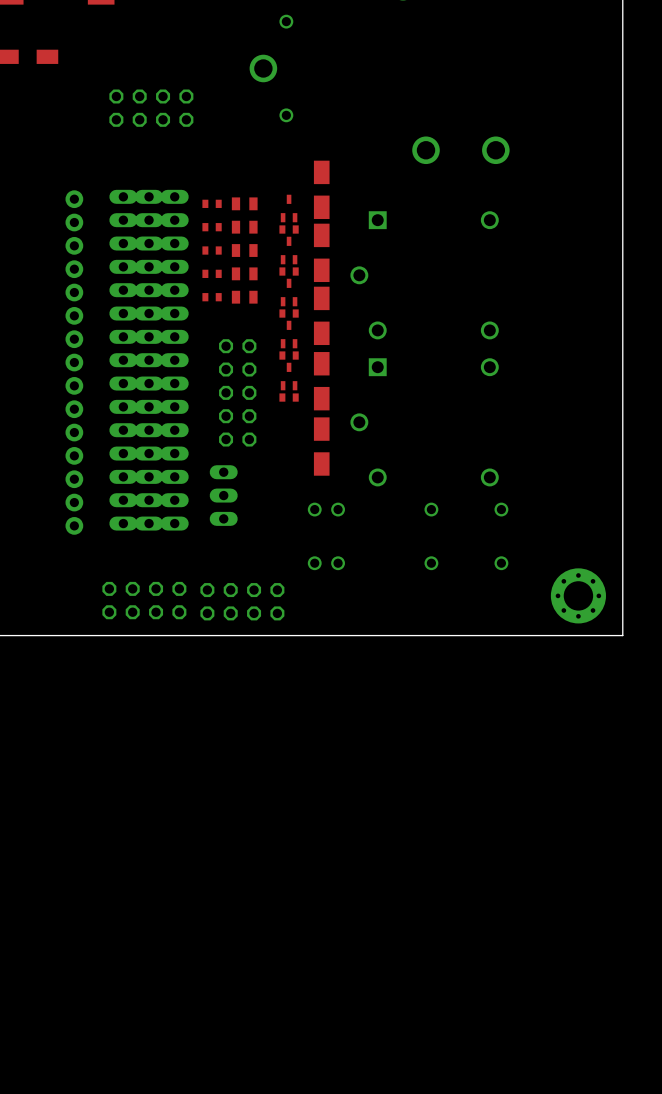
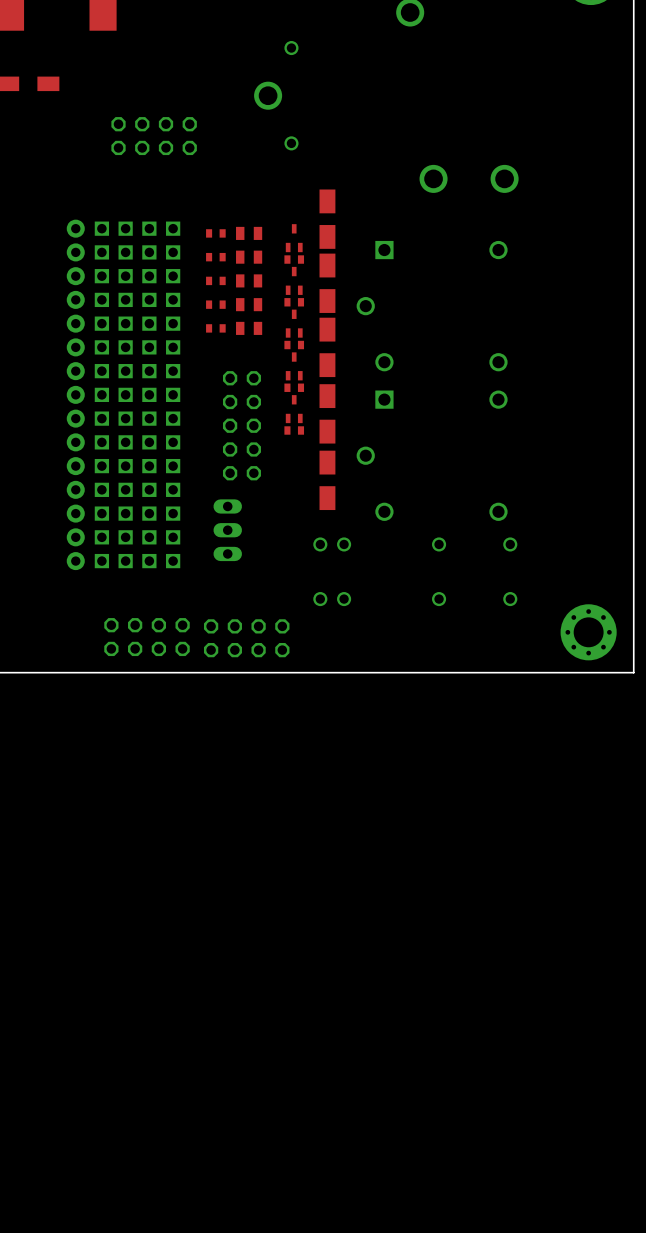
part footprint: [109, 189, 138, 531] -> [118, 221, 133, 569]
part footprint: [135, 189, 164, 531] -> [142, 221, 157, 569]
part footprint: [160, 189, 189, 531] -> [166, 221, 181, 569]
part: none -> (101, 394)

